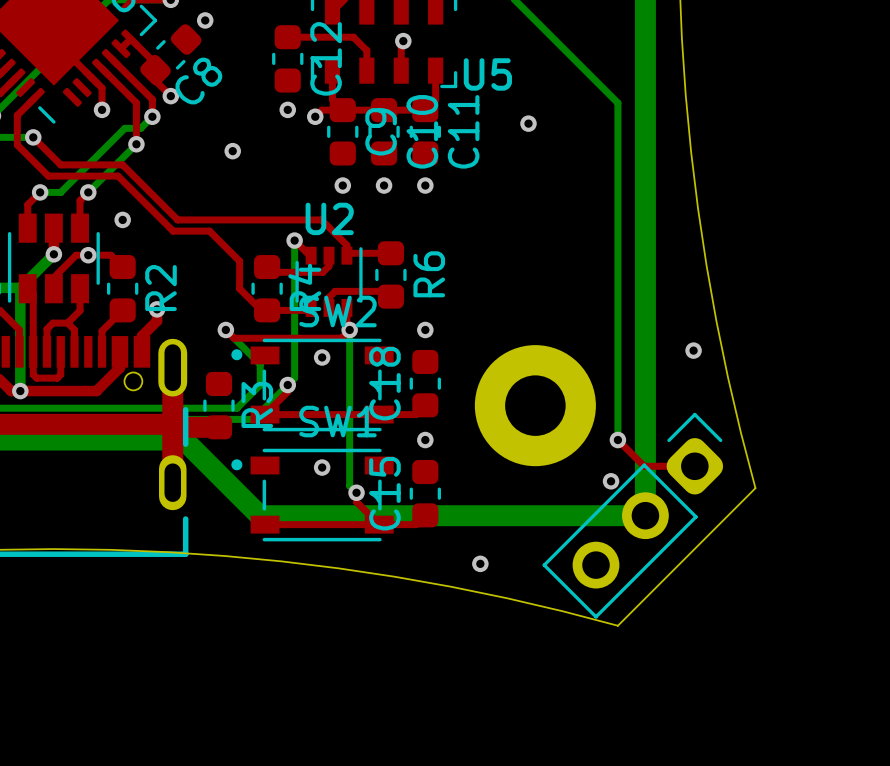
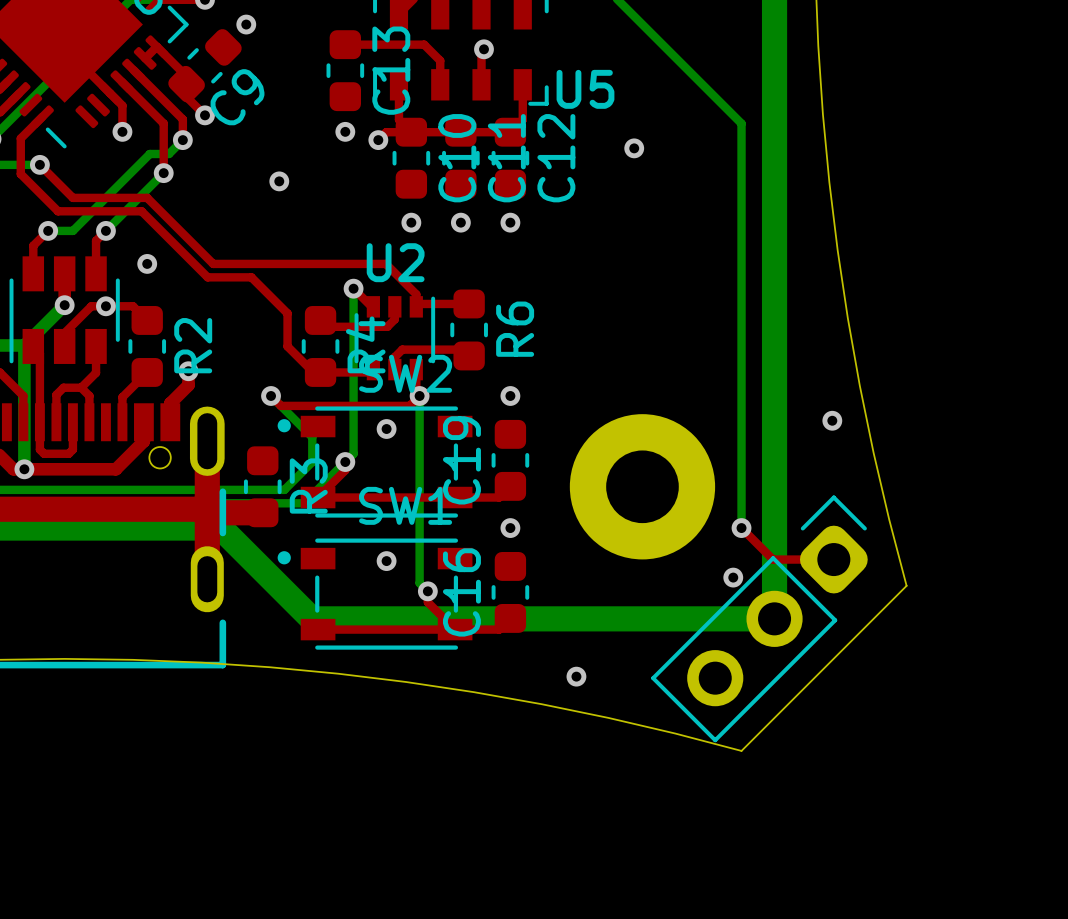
C12 name: C12 (326, 58) -> C13 (391, 70)
C8 name: C8 (198, 81) -> C9 (237, 97)
C9 name: C9 (381, 131) -> C10 (457, 158)
C10 name: C10 (422, 131) -> C11 (506, 158)
C11 name: C11 (463, 131) -> C12 (556, 158)
C18 name: C18 (384, 383) -> C19 (461, 460)
C15 name: C15 (384, 493) -> C16 (461, 592)

